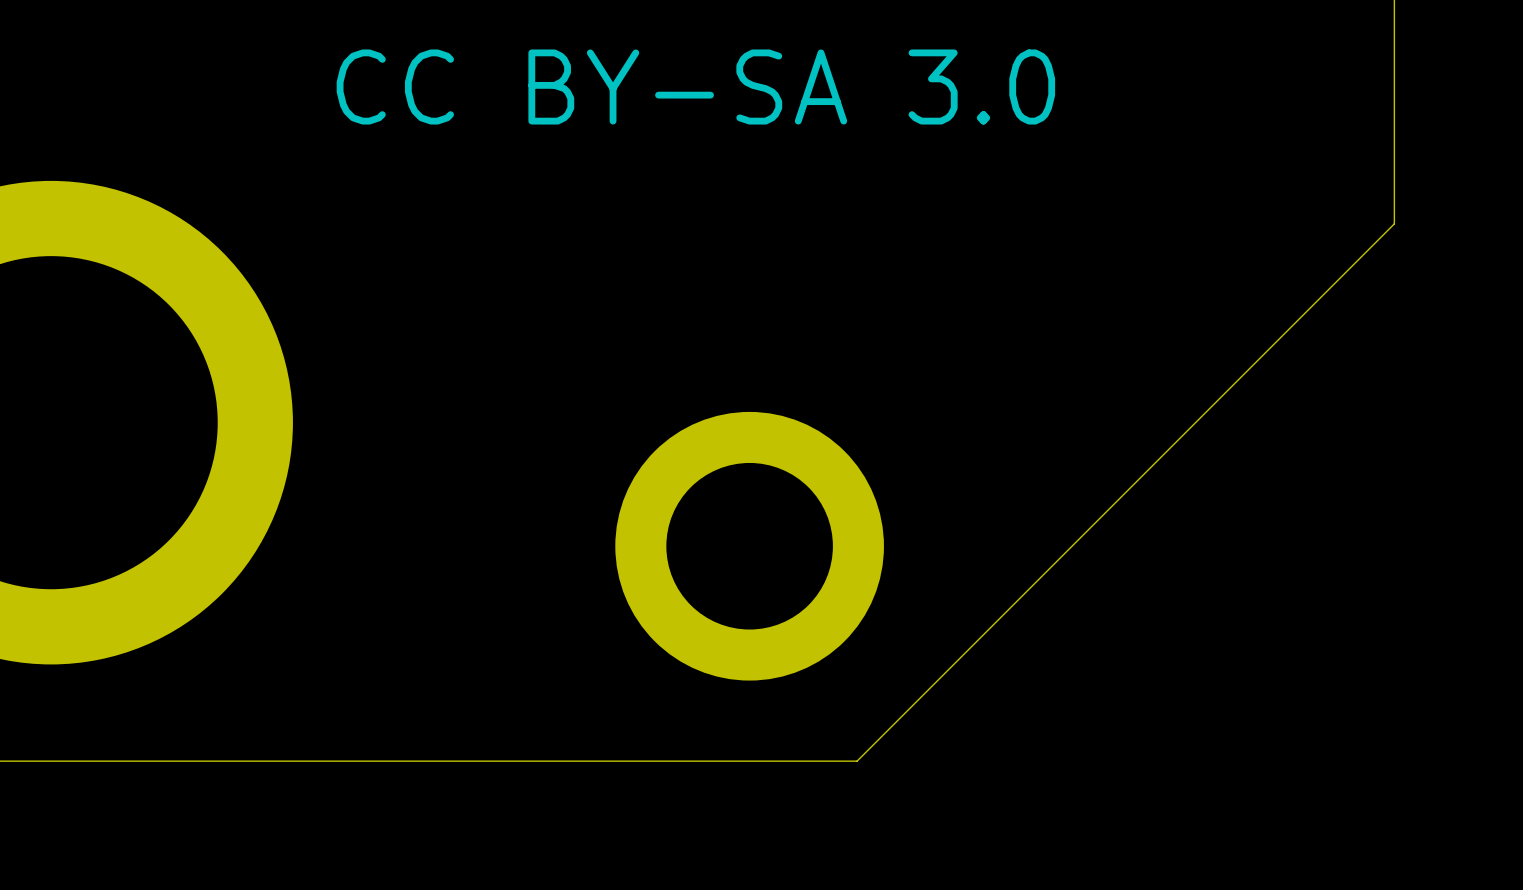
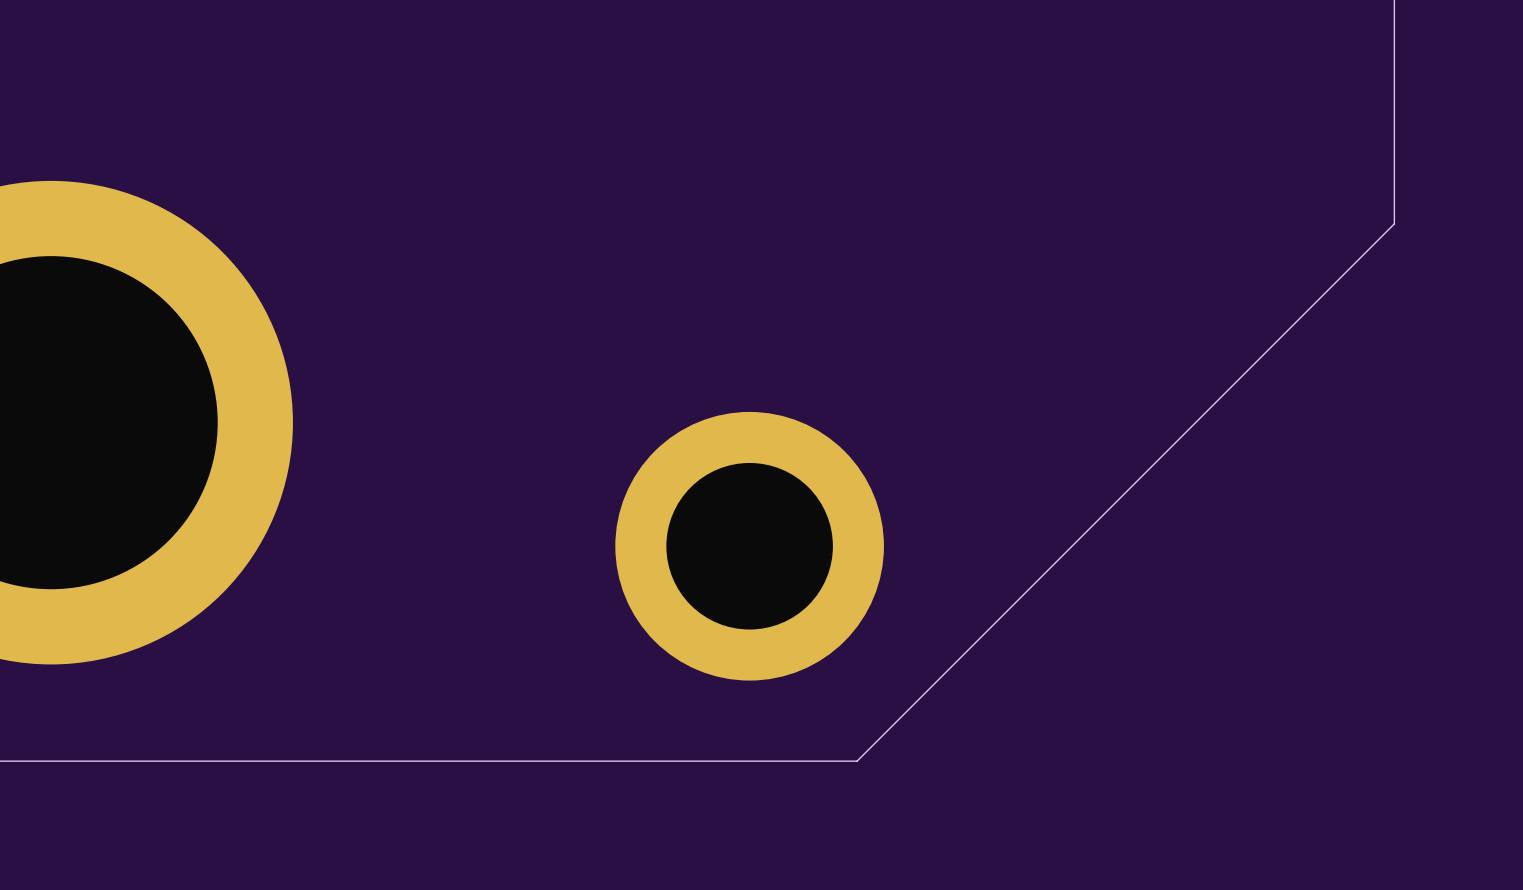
text: CC BY-SA 3.0 (695, 87) -> none

